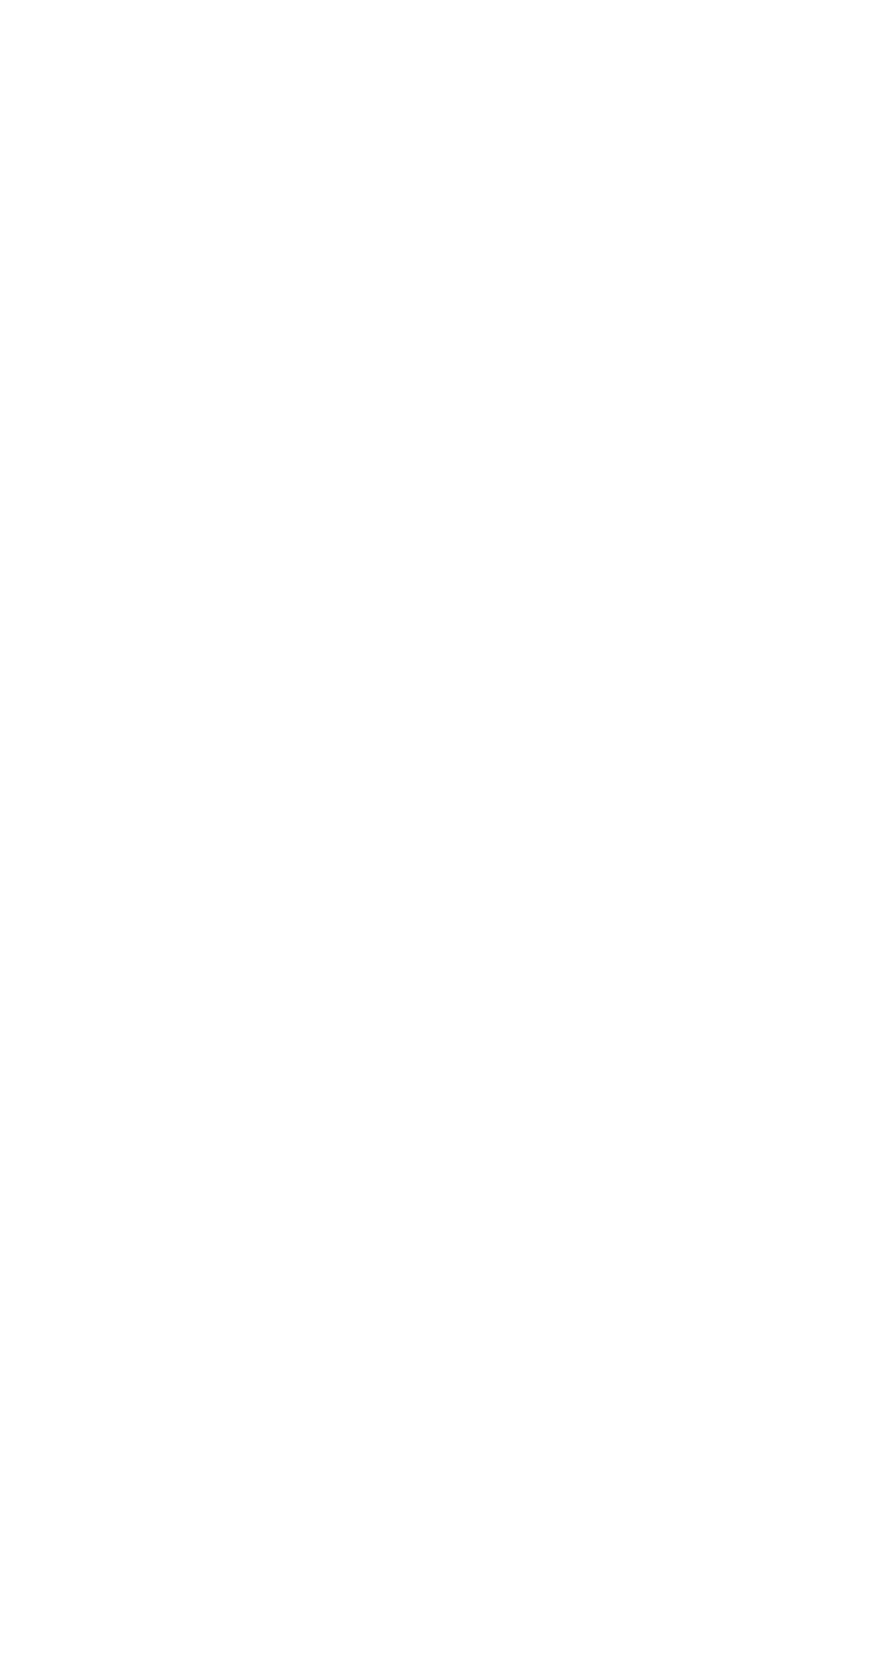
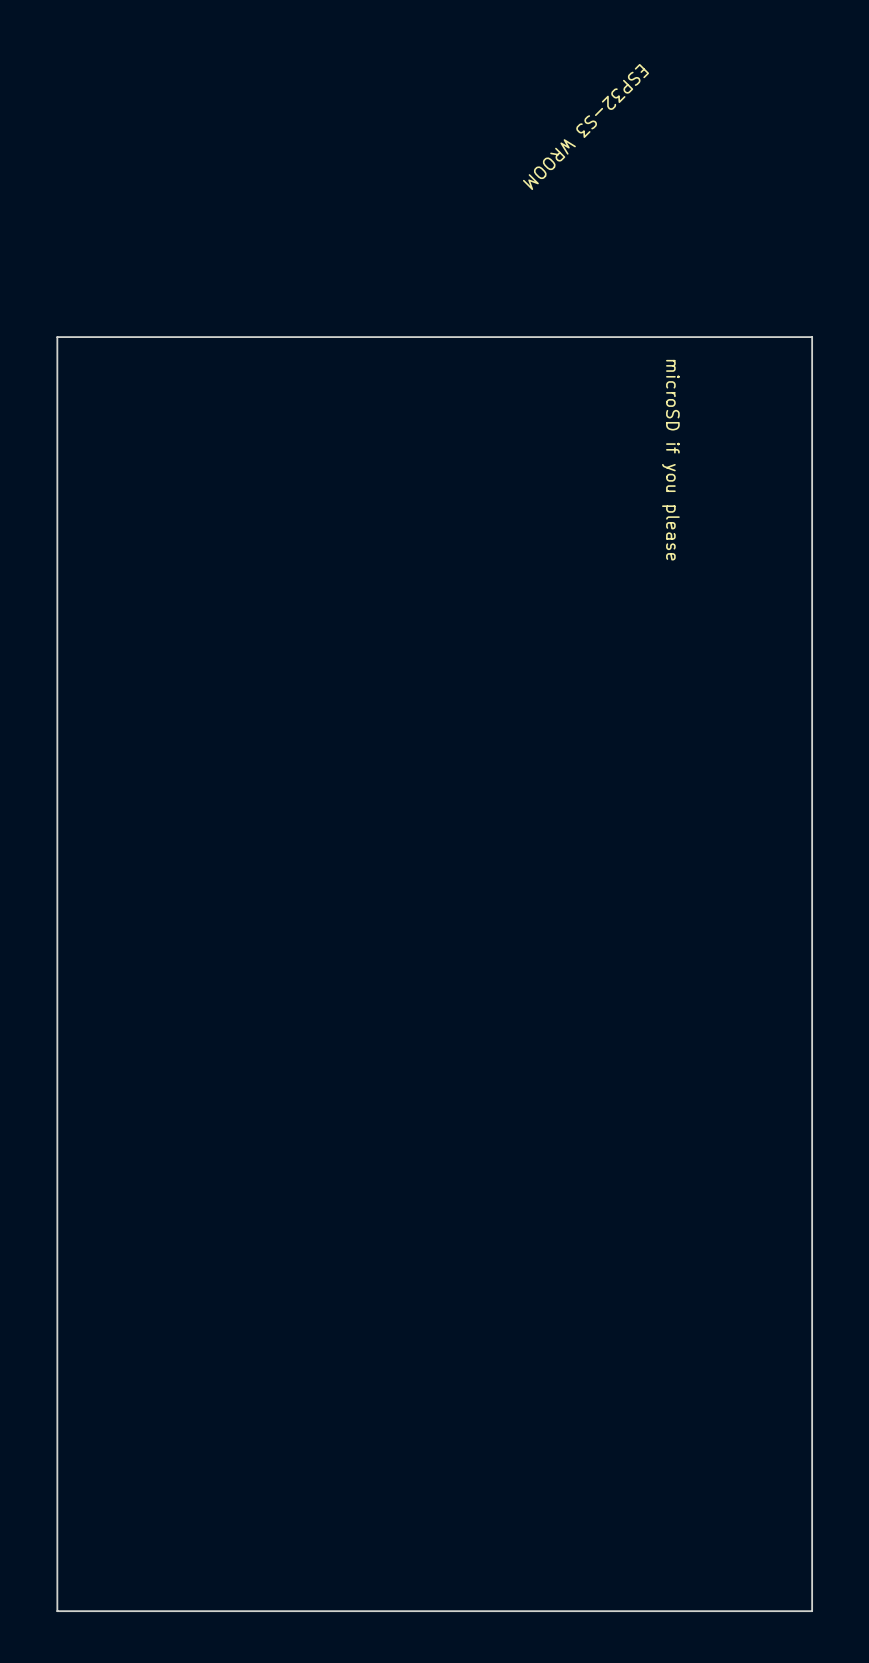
text: none -> ESP32-S3 WROOM (586, 126)
board edge: none -> (812, 337) (57, 337) (57, 1611) (812, 1611) (812, 337)
text: none -> microSD if you please (670, 460)

